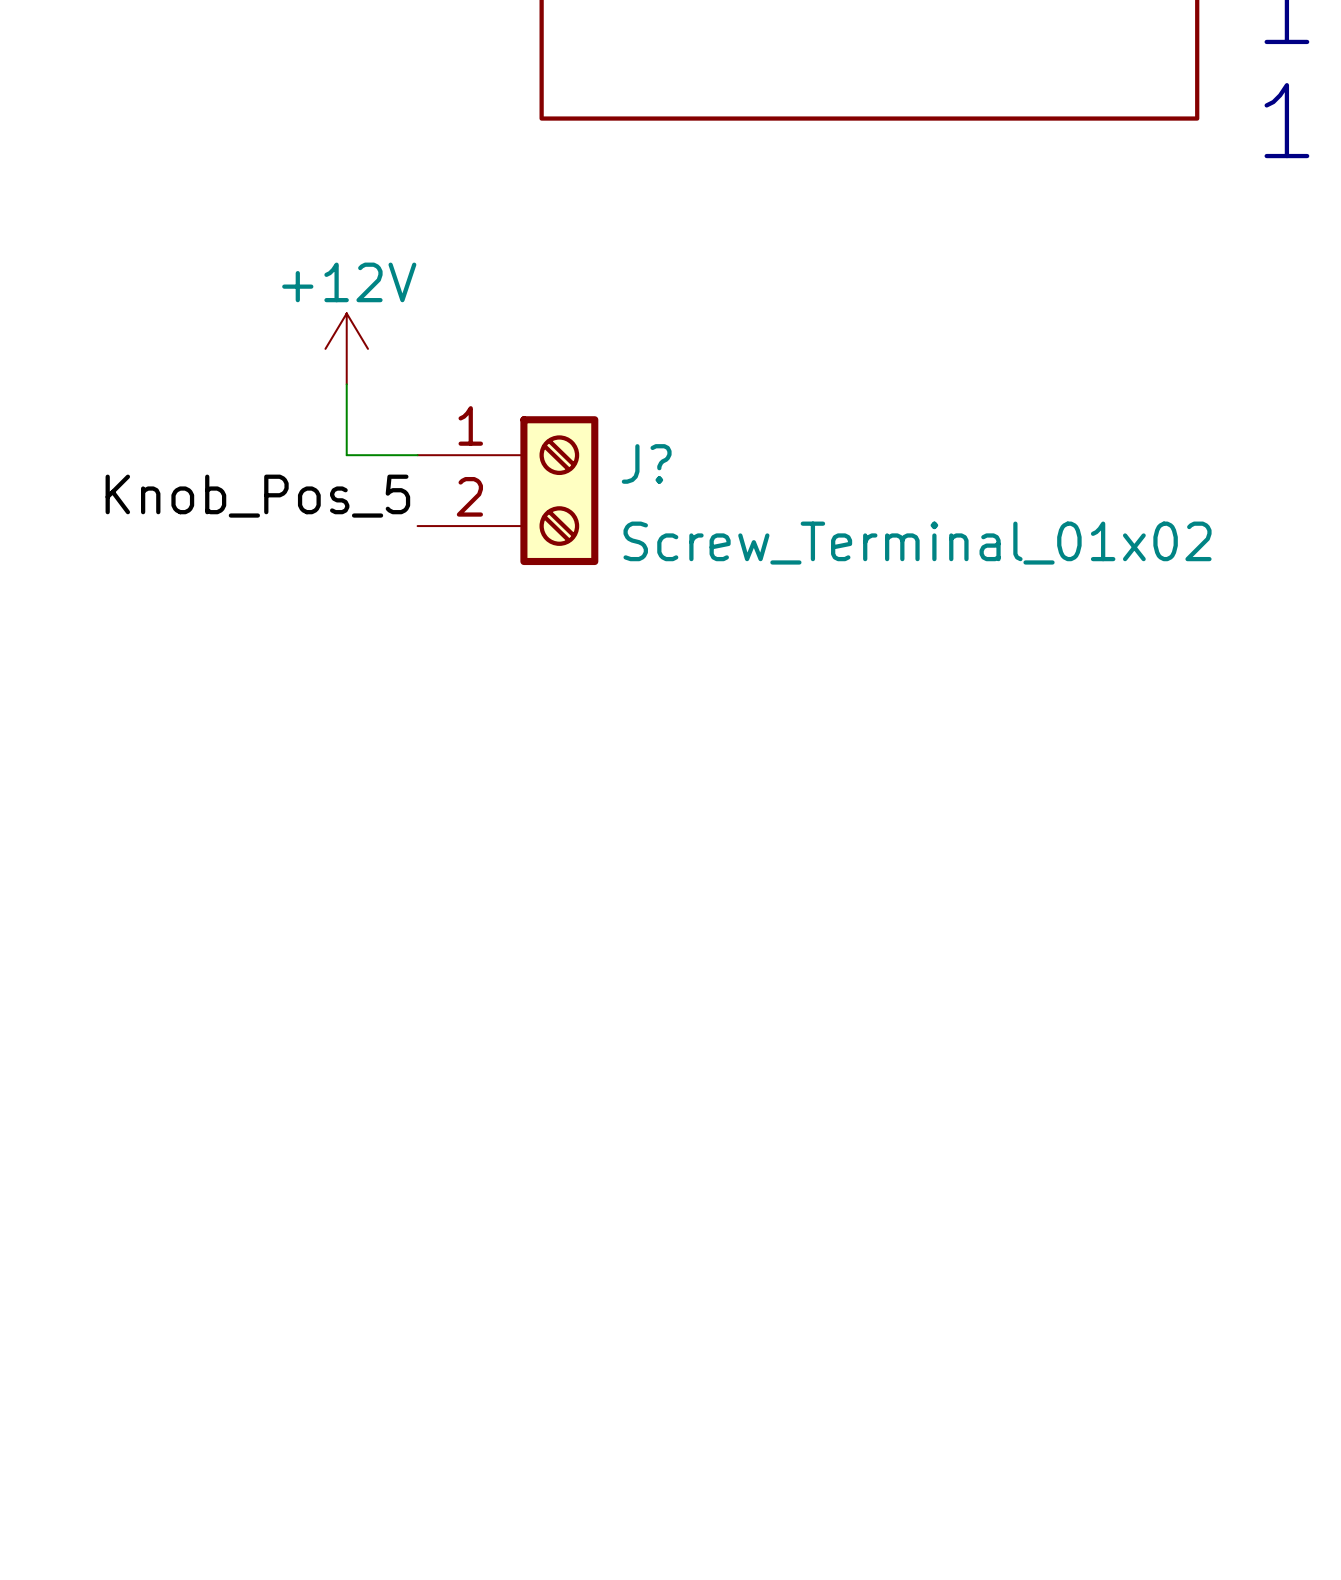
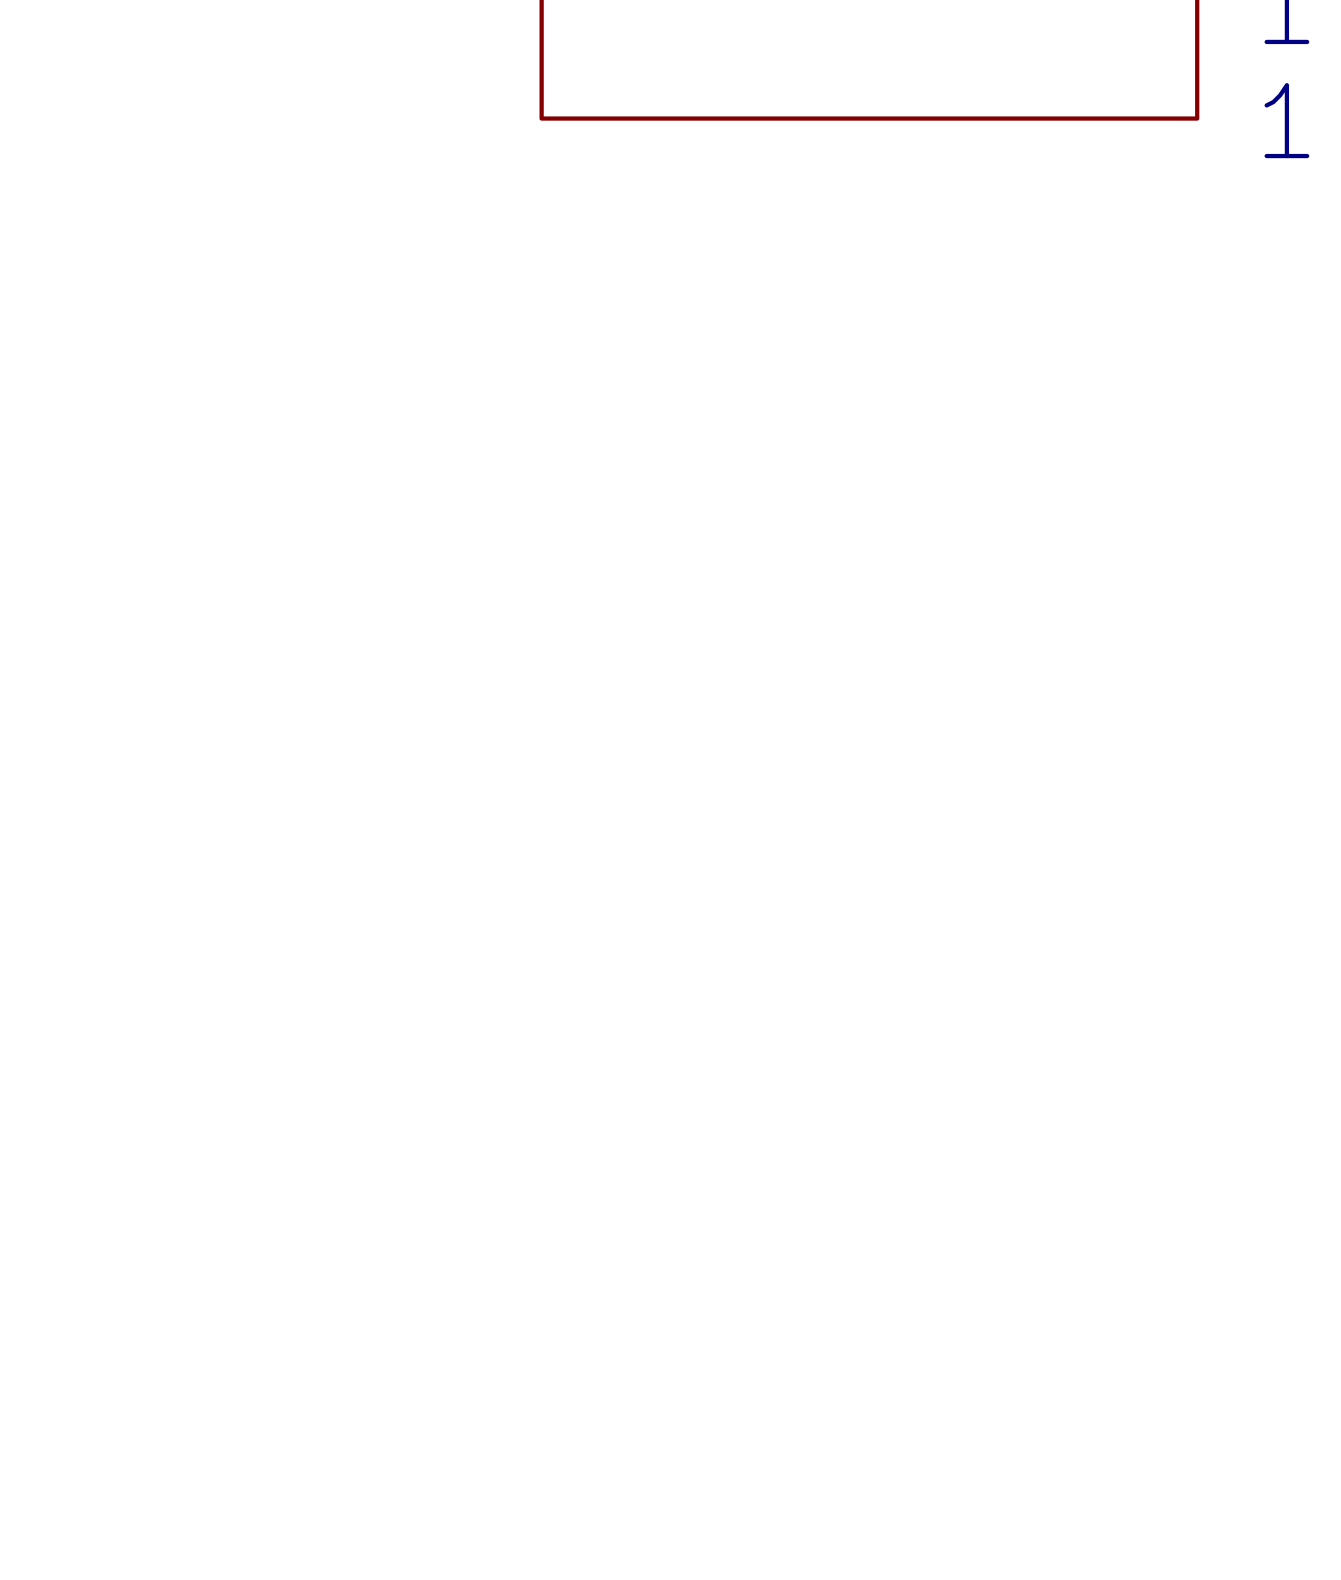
power symbol: +12V (346, 348) -> none
wire: (346, 384) (346, 455) (417, 455) -> none
J?: Screw_Terminal_01x02 (507, 490) -> none
label: Knob_Pos_5 (257, 496) -> none

